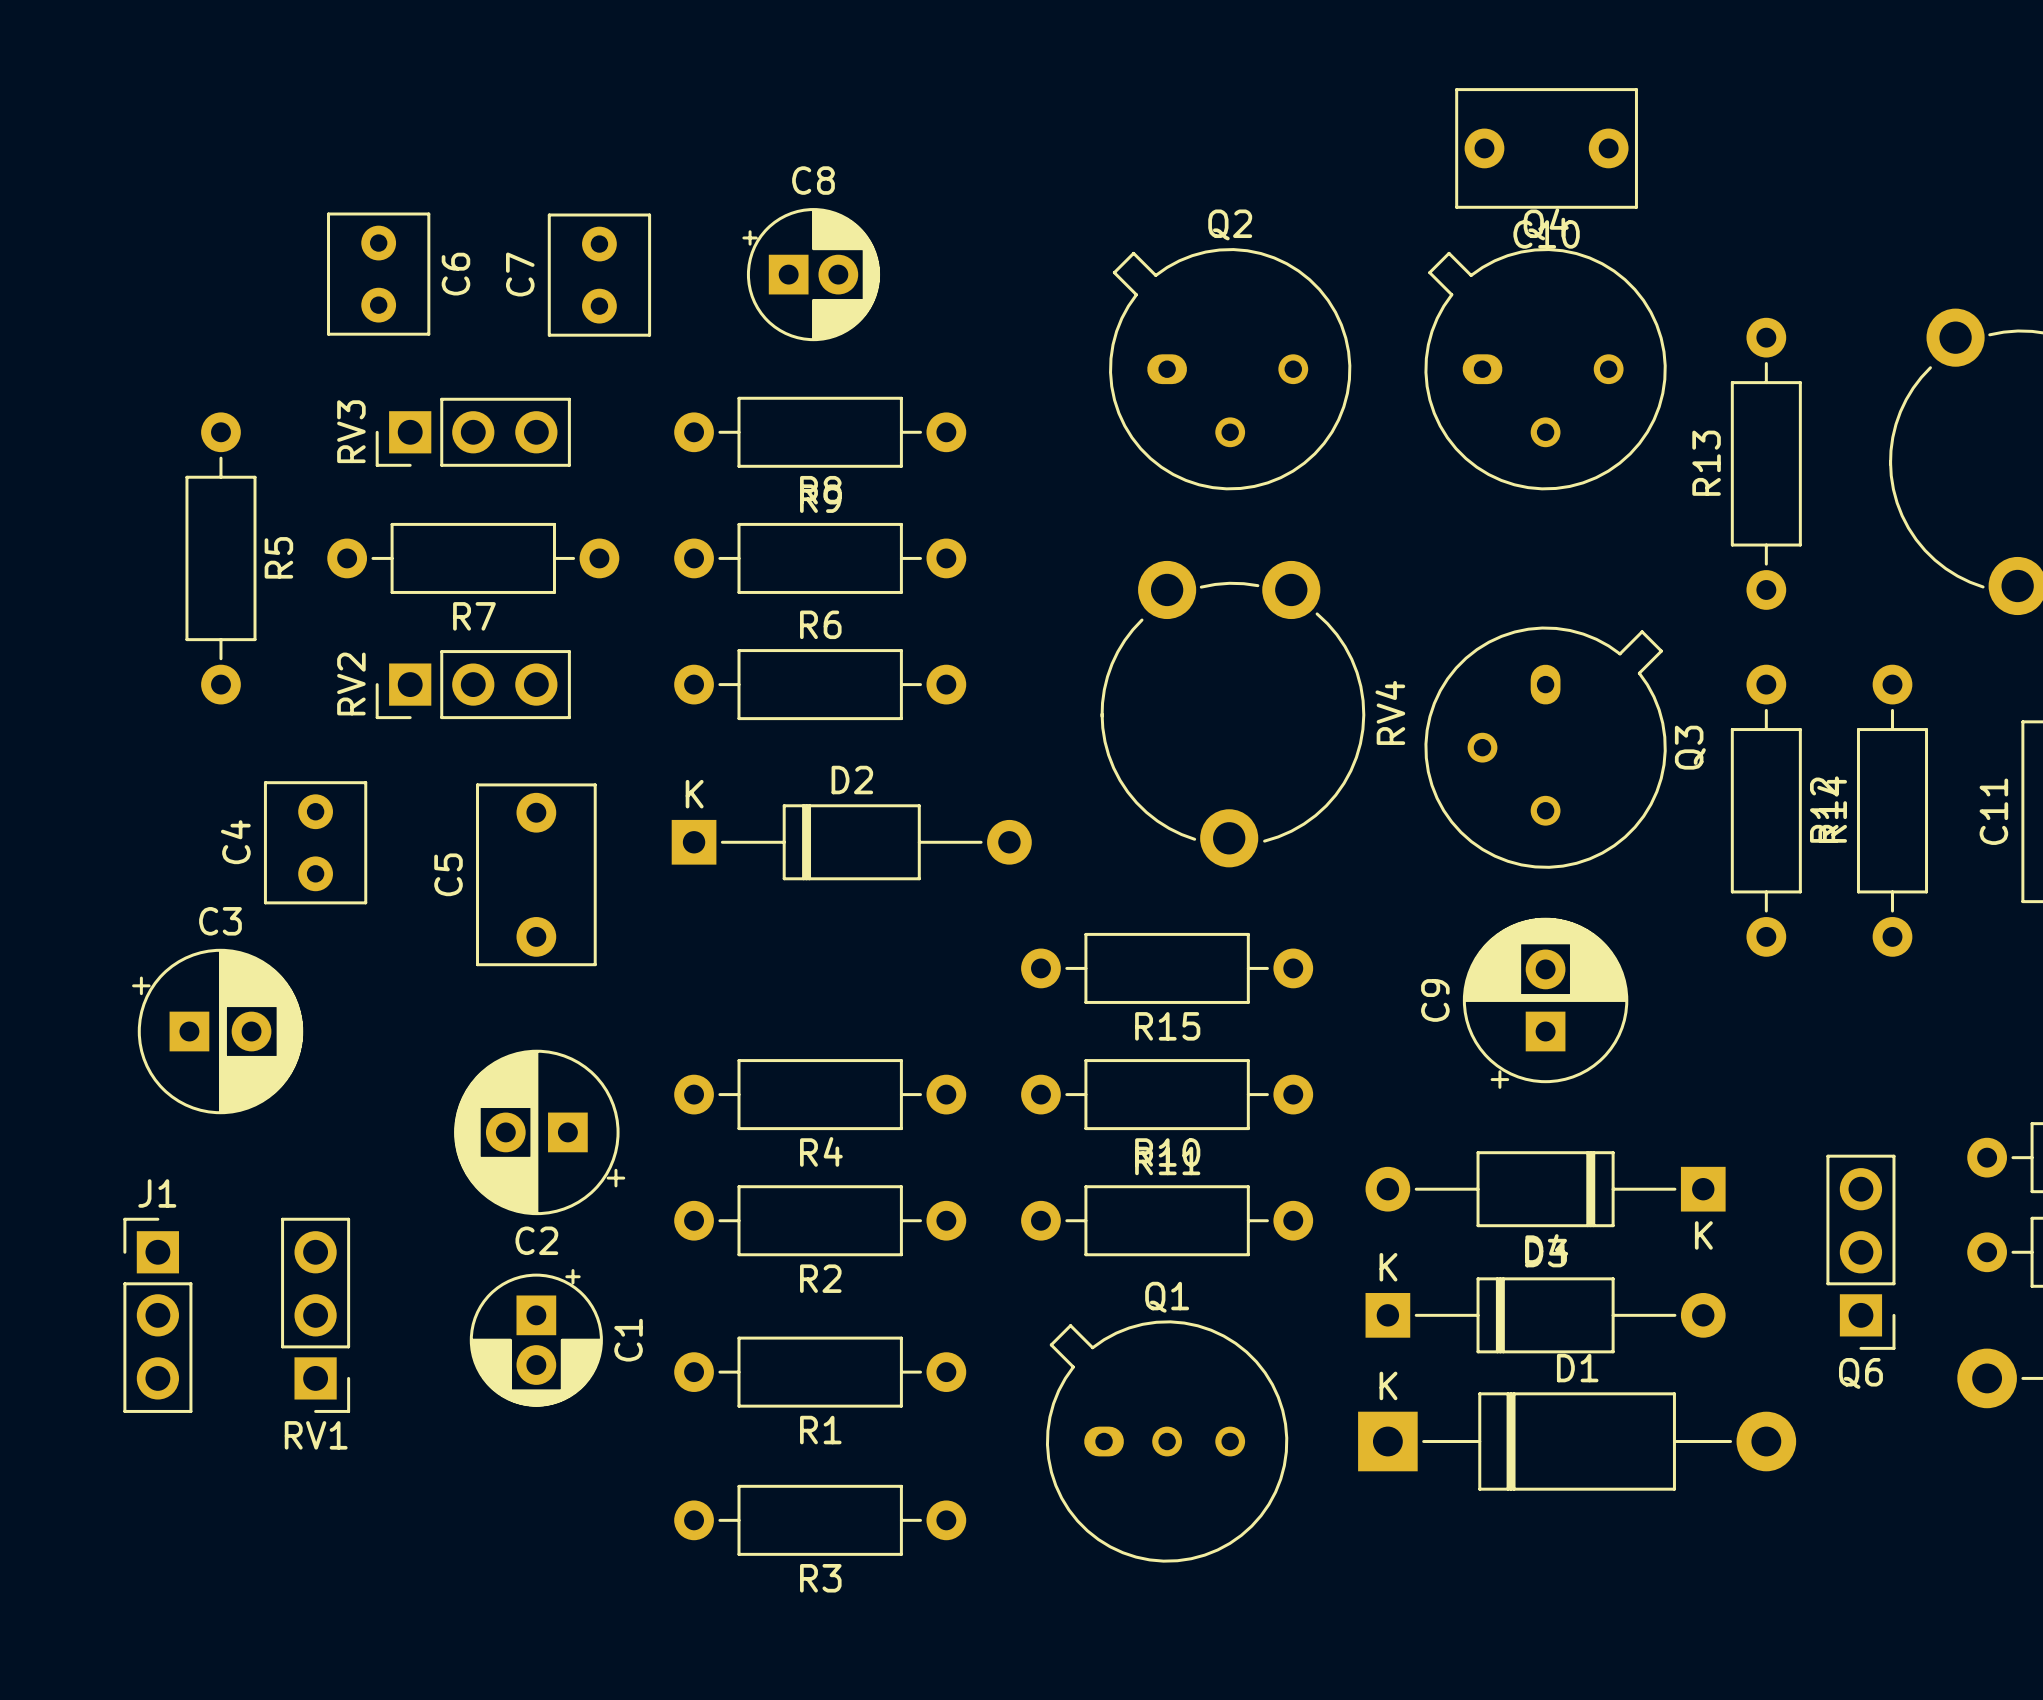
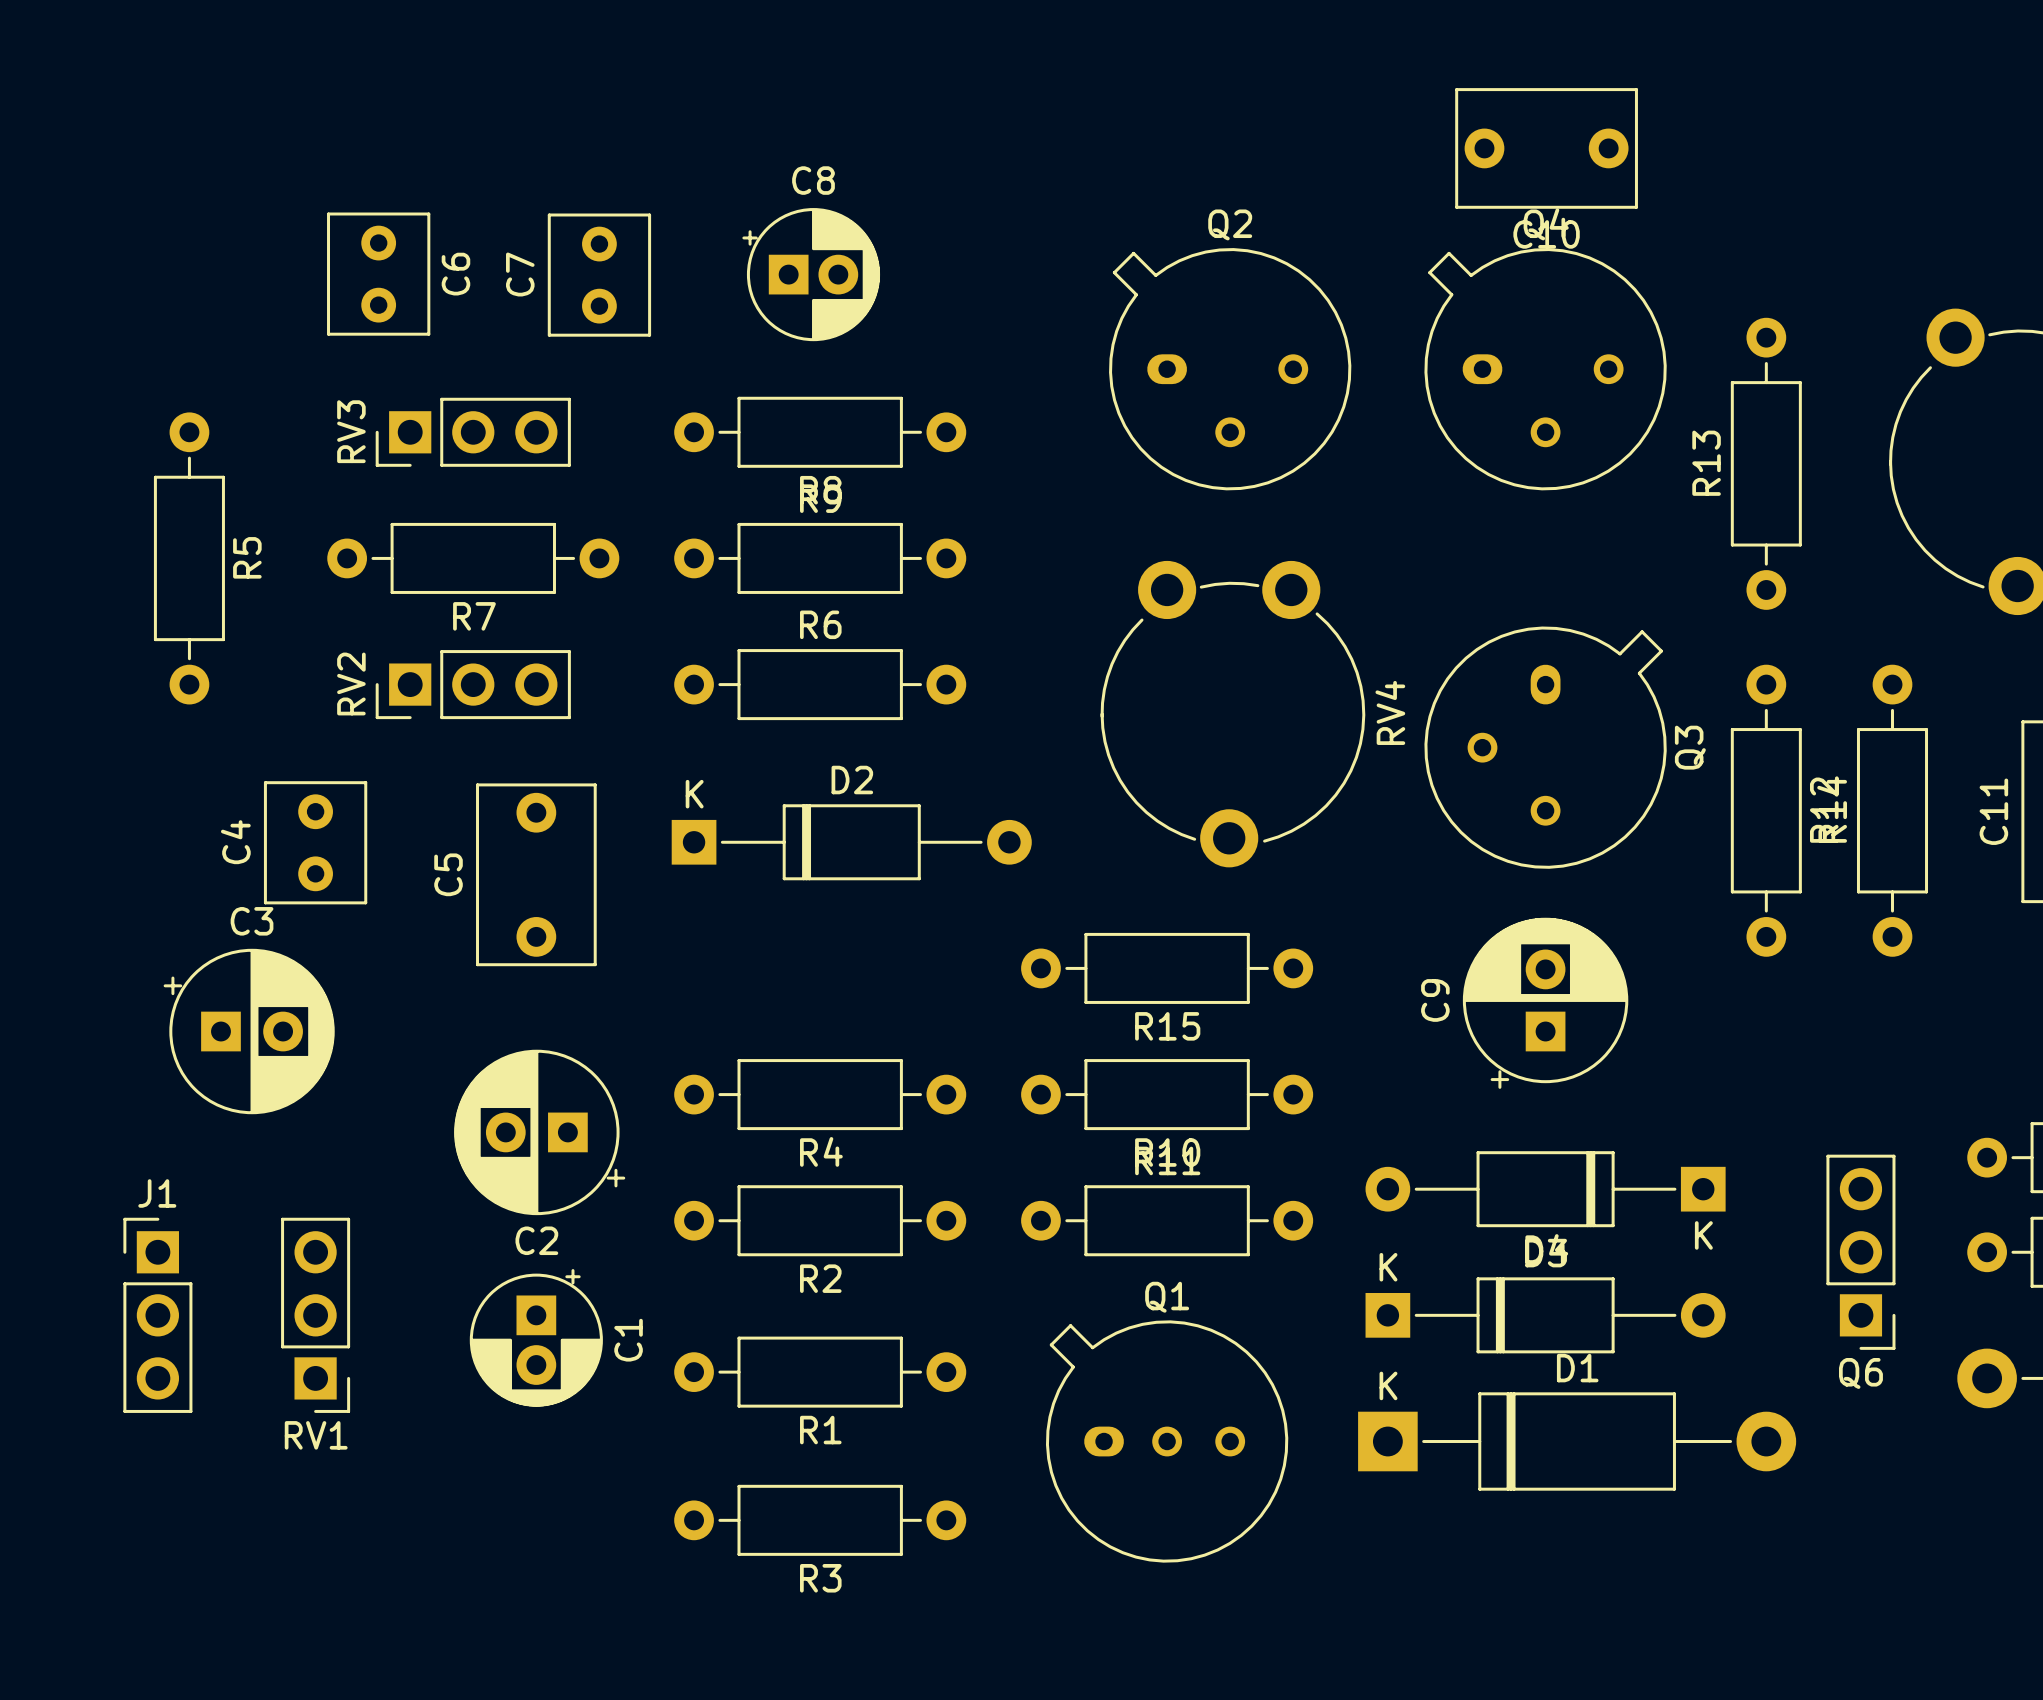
R5 position: (220, 558) -> (189, 558)
C3 position: (217, 1031) -> (249, 1031)

